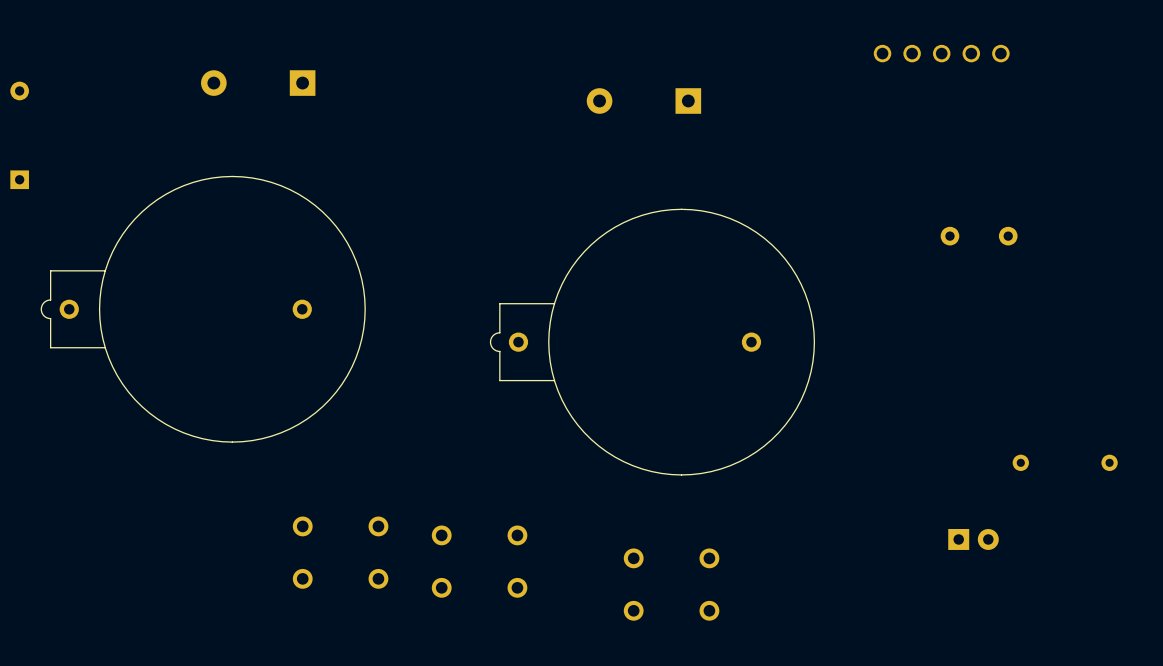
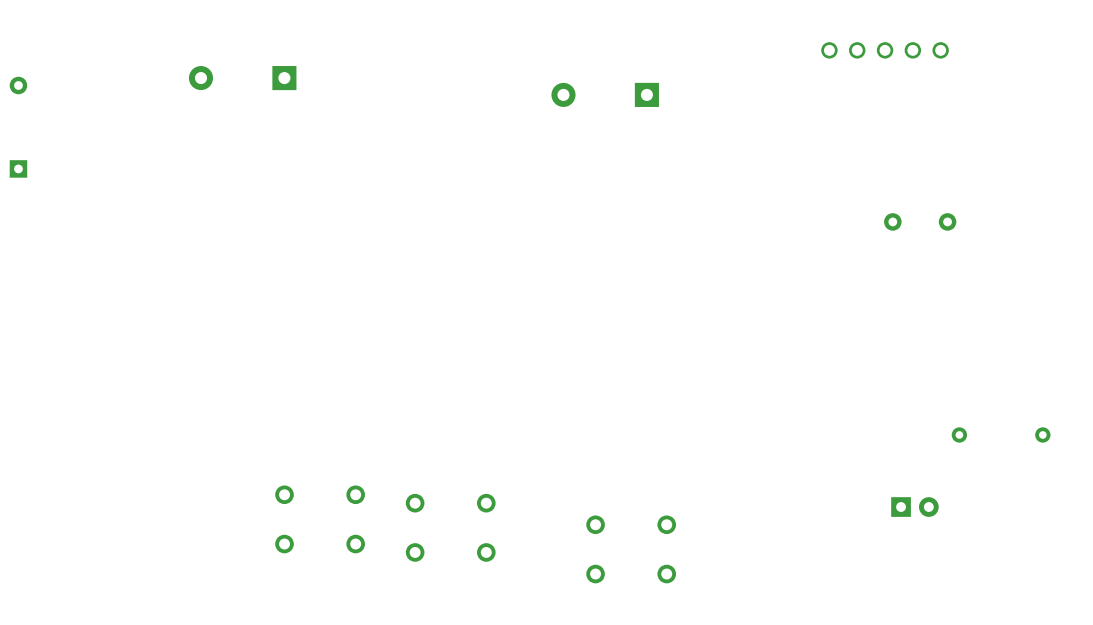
part: (203, 309) -> none
part: (652, 342) -> none

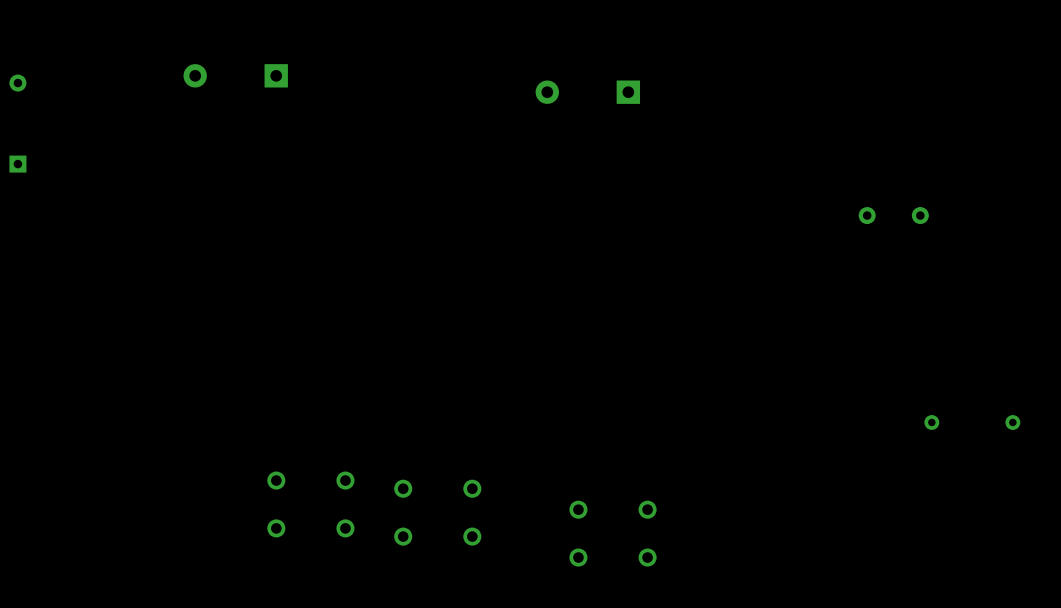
part: (885, 50) -> none
part: (914, 507) -> none

